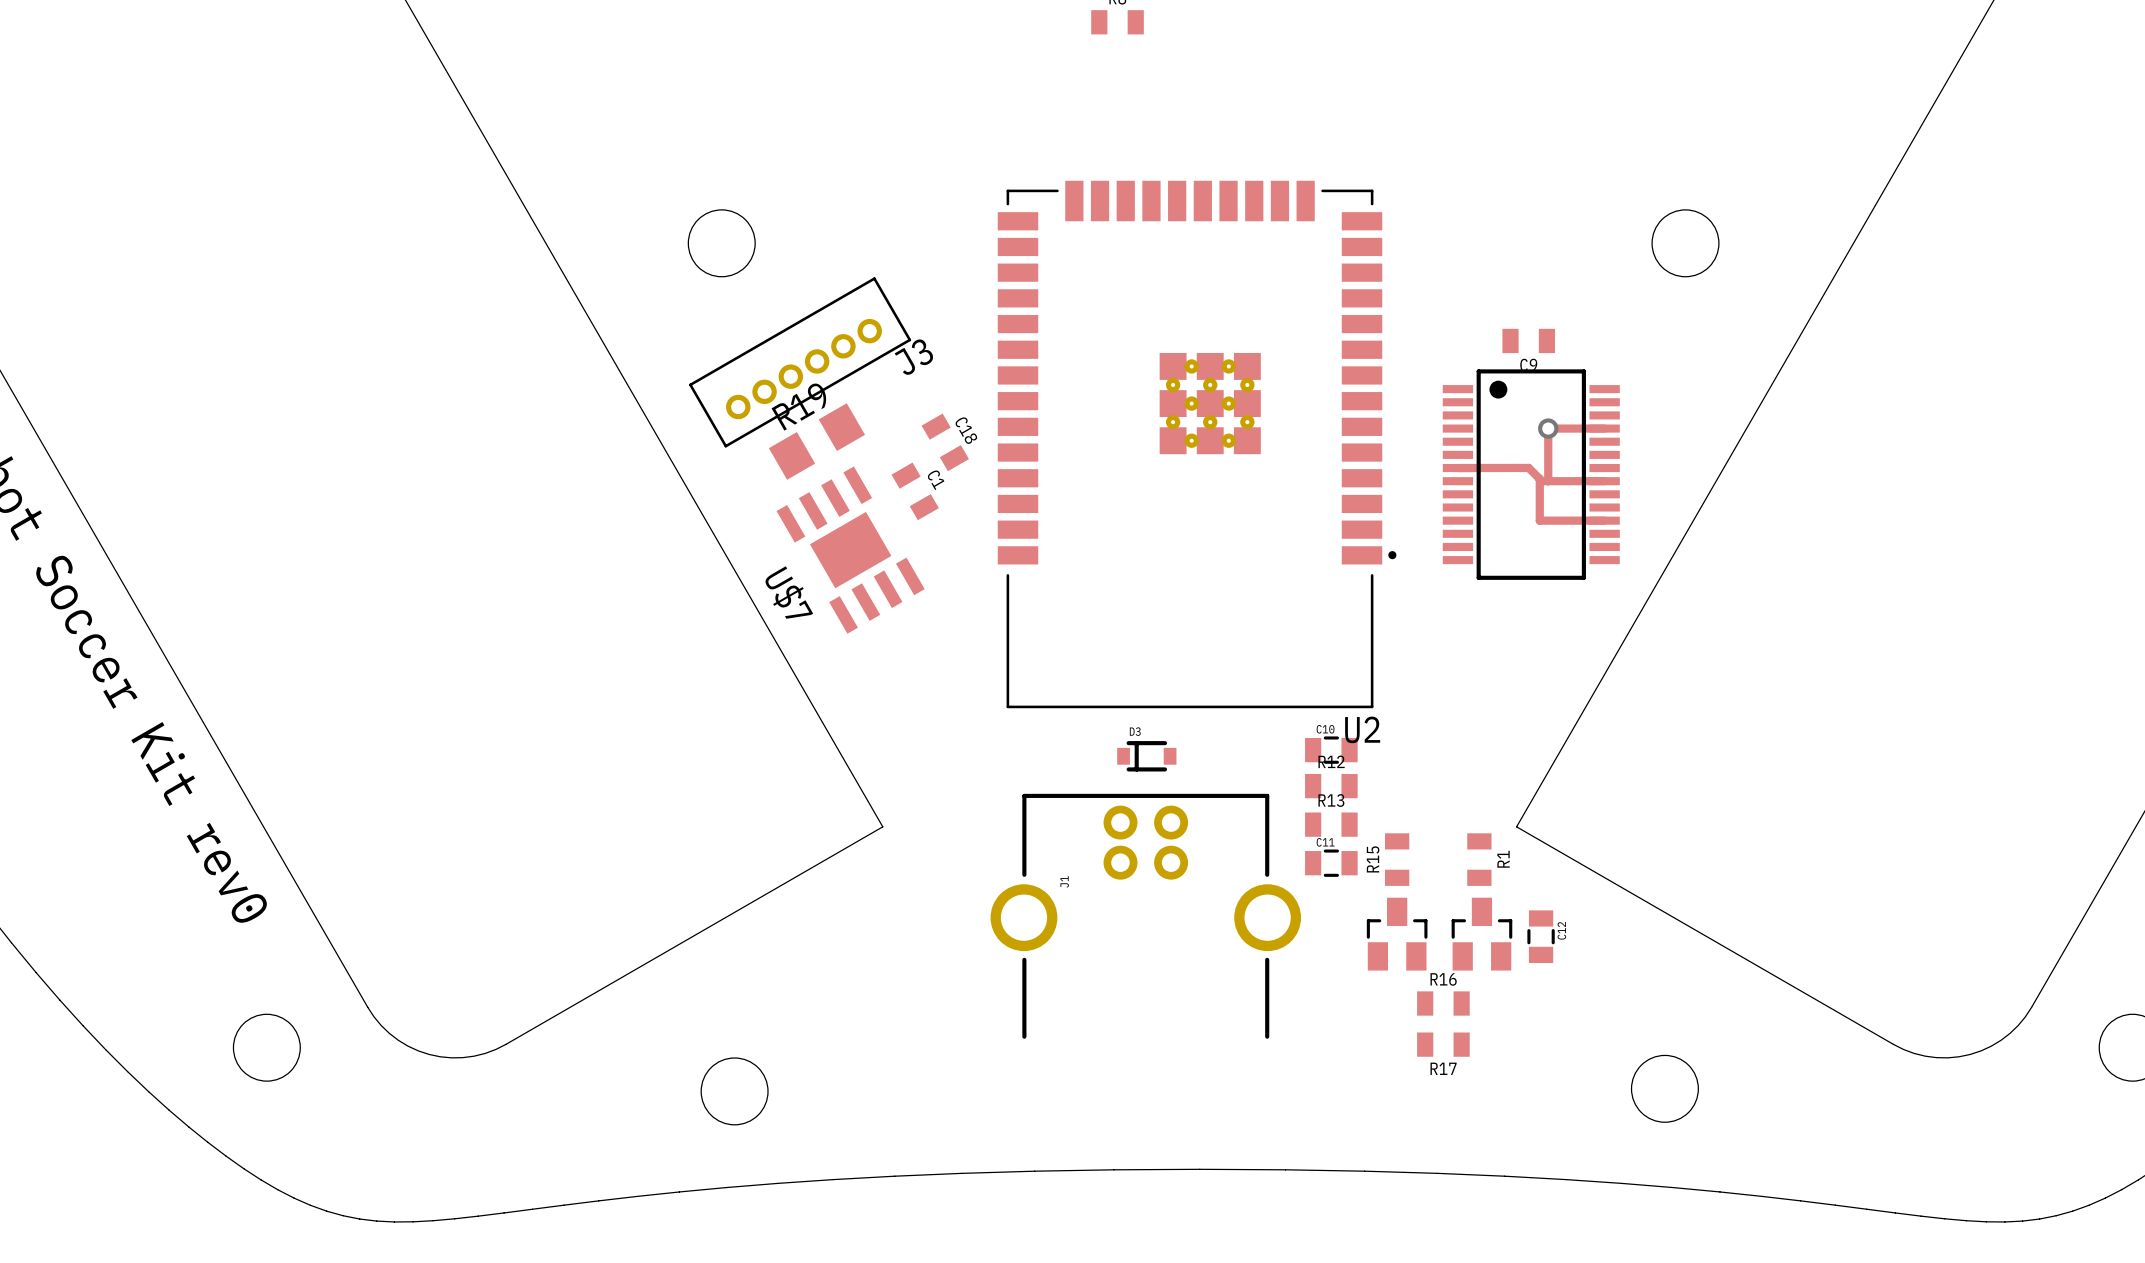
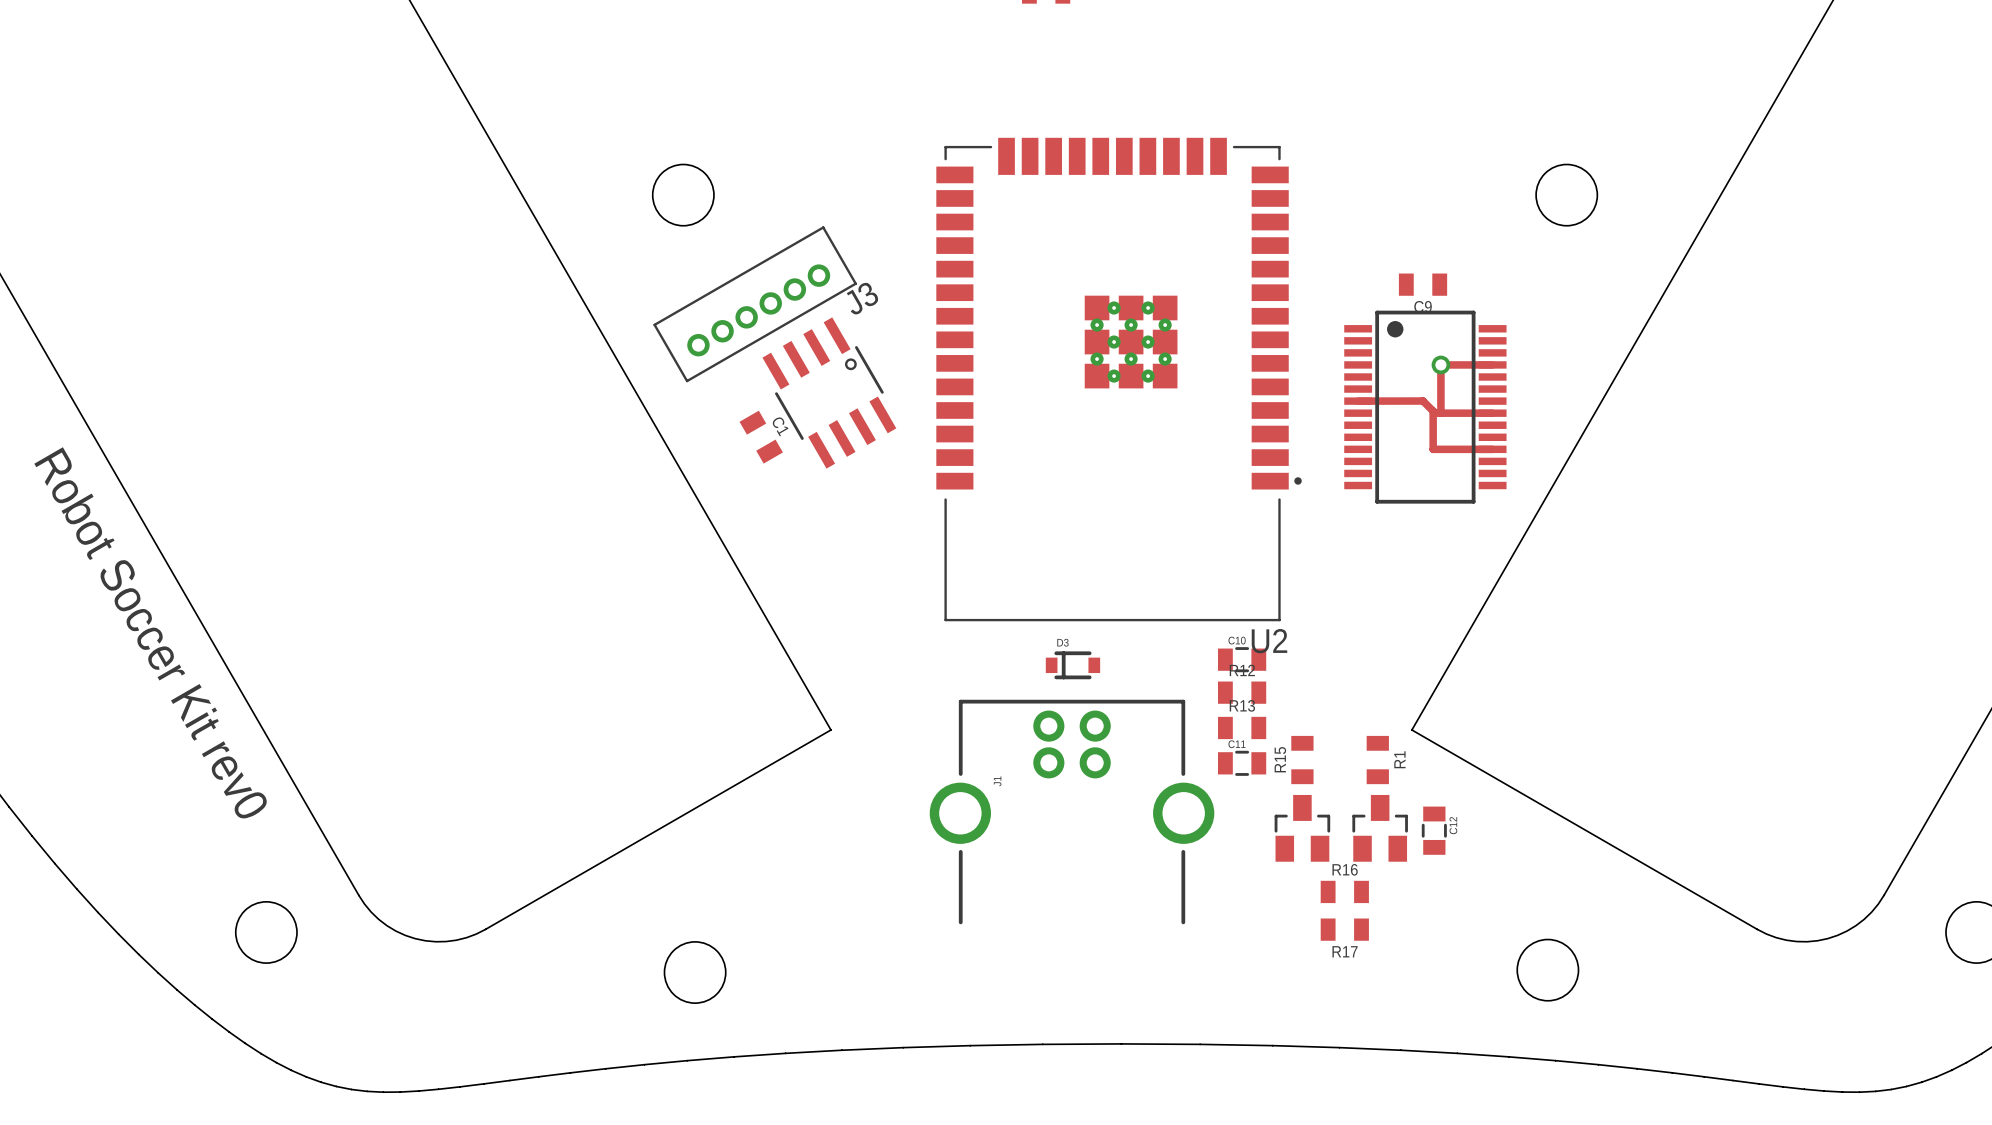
R19: (816, 441) -> none
C18: (945, 442) -> none
part: none -> (829, 393)
C1 position: (915, 491) -> (761, 437)
U$7: (850, 550) -> none

